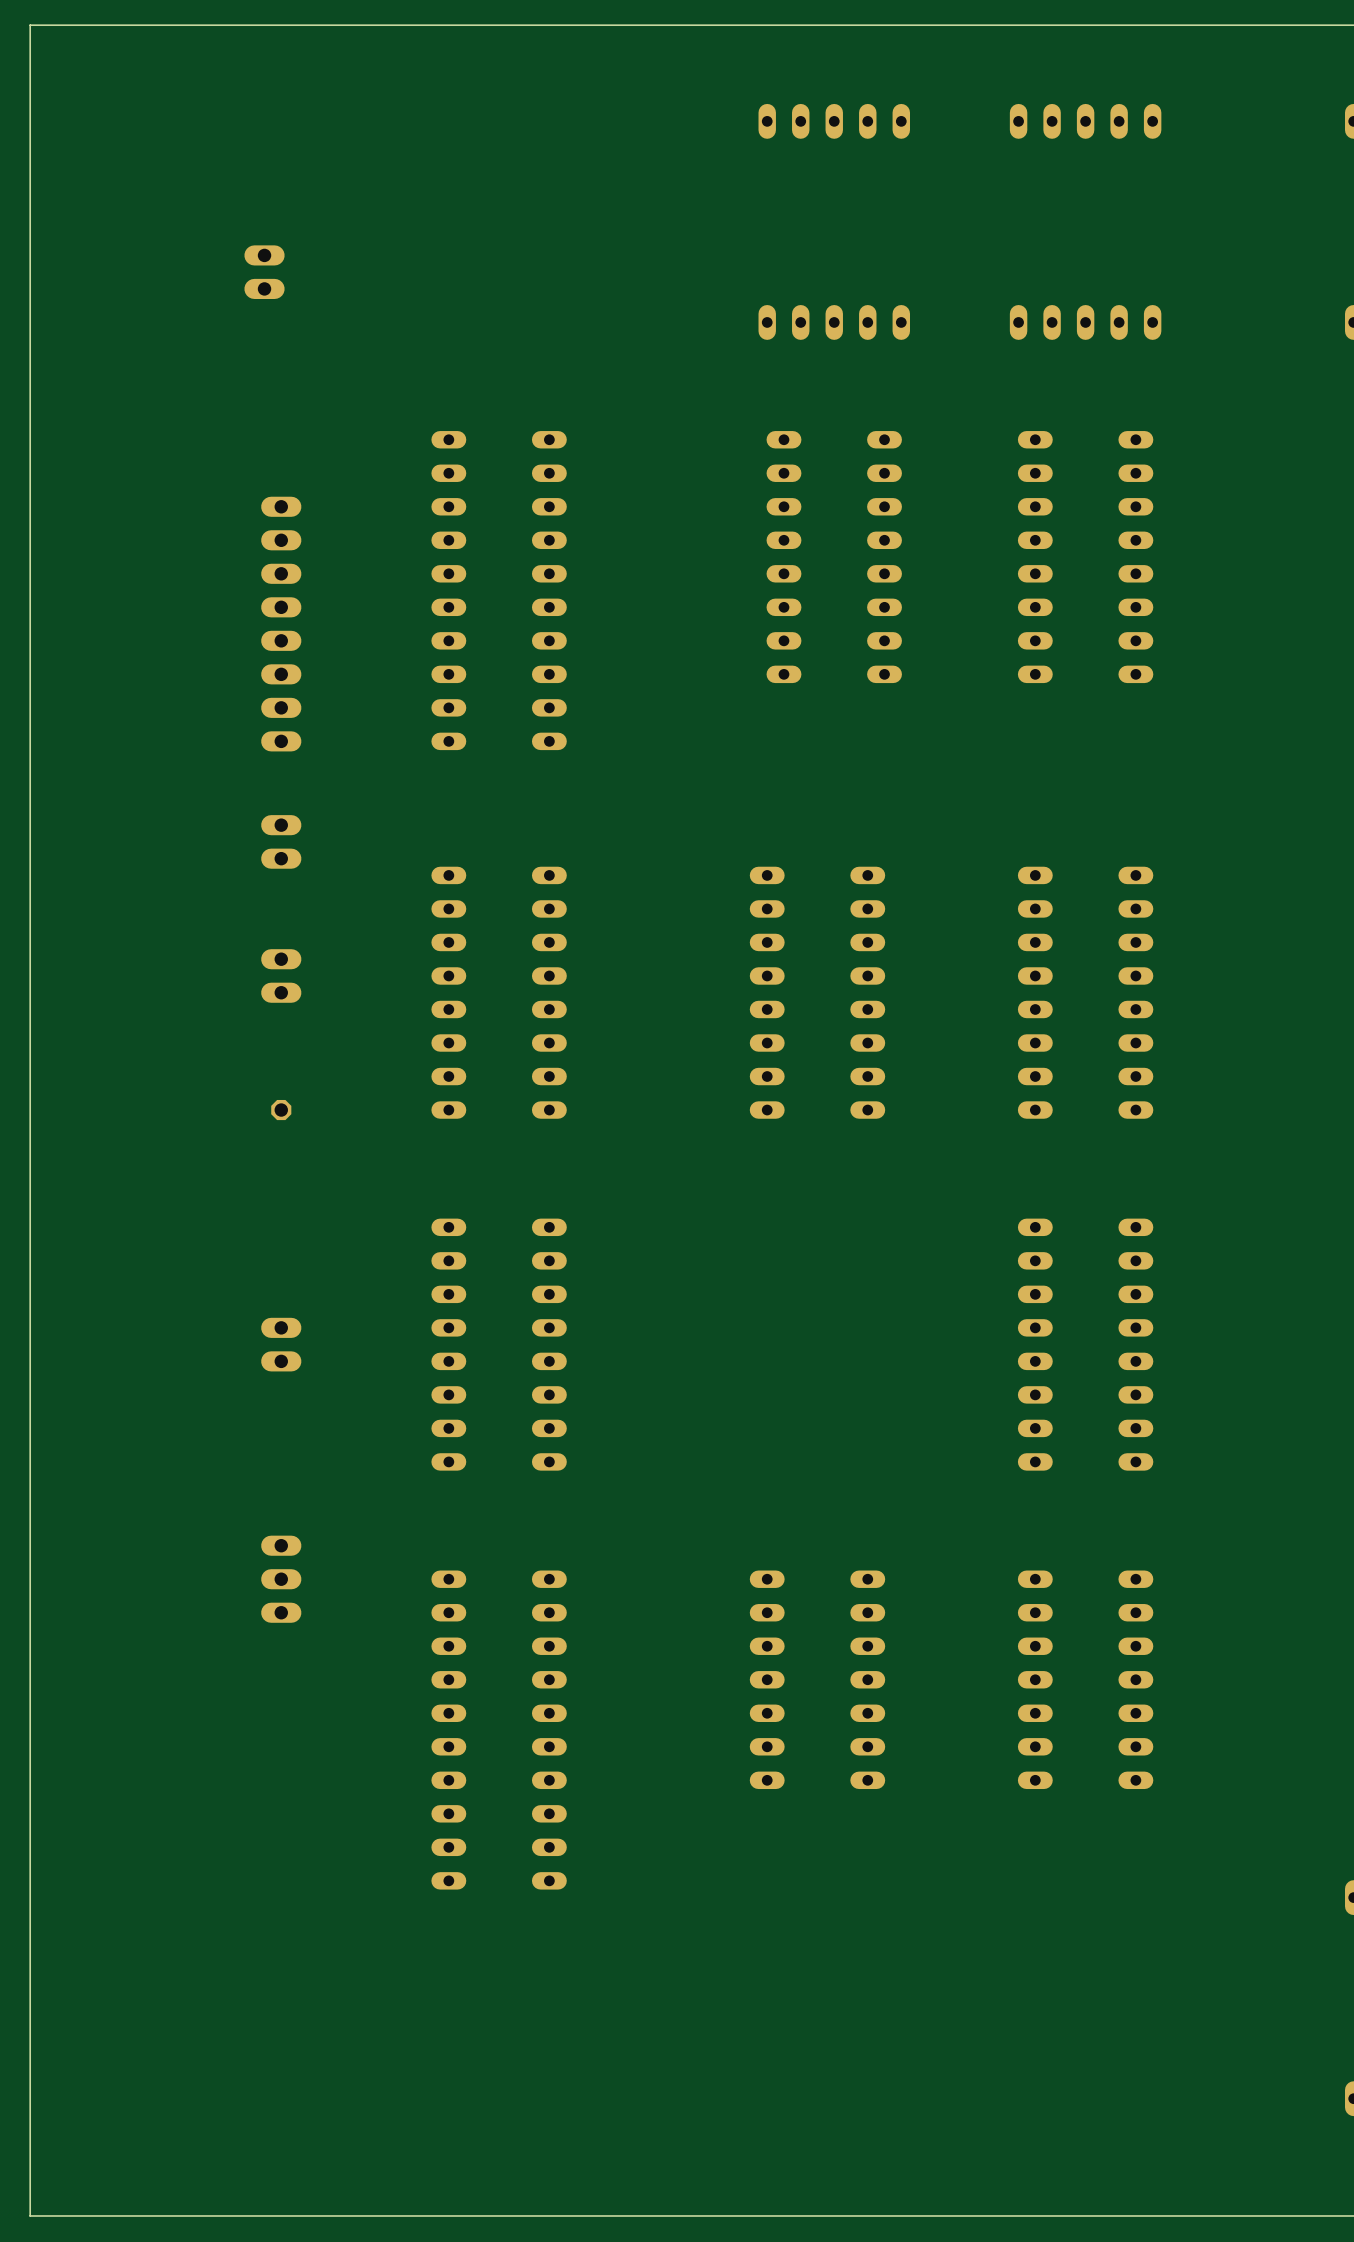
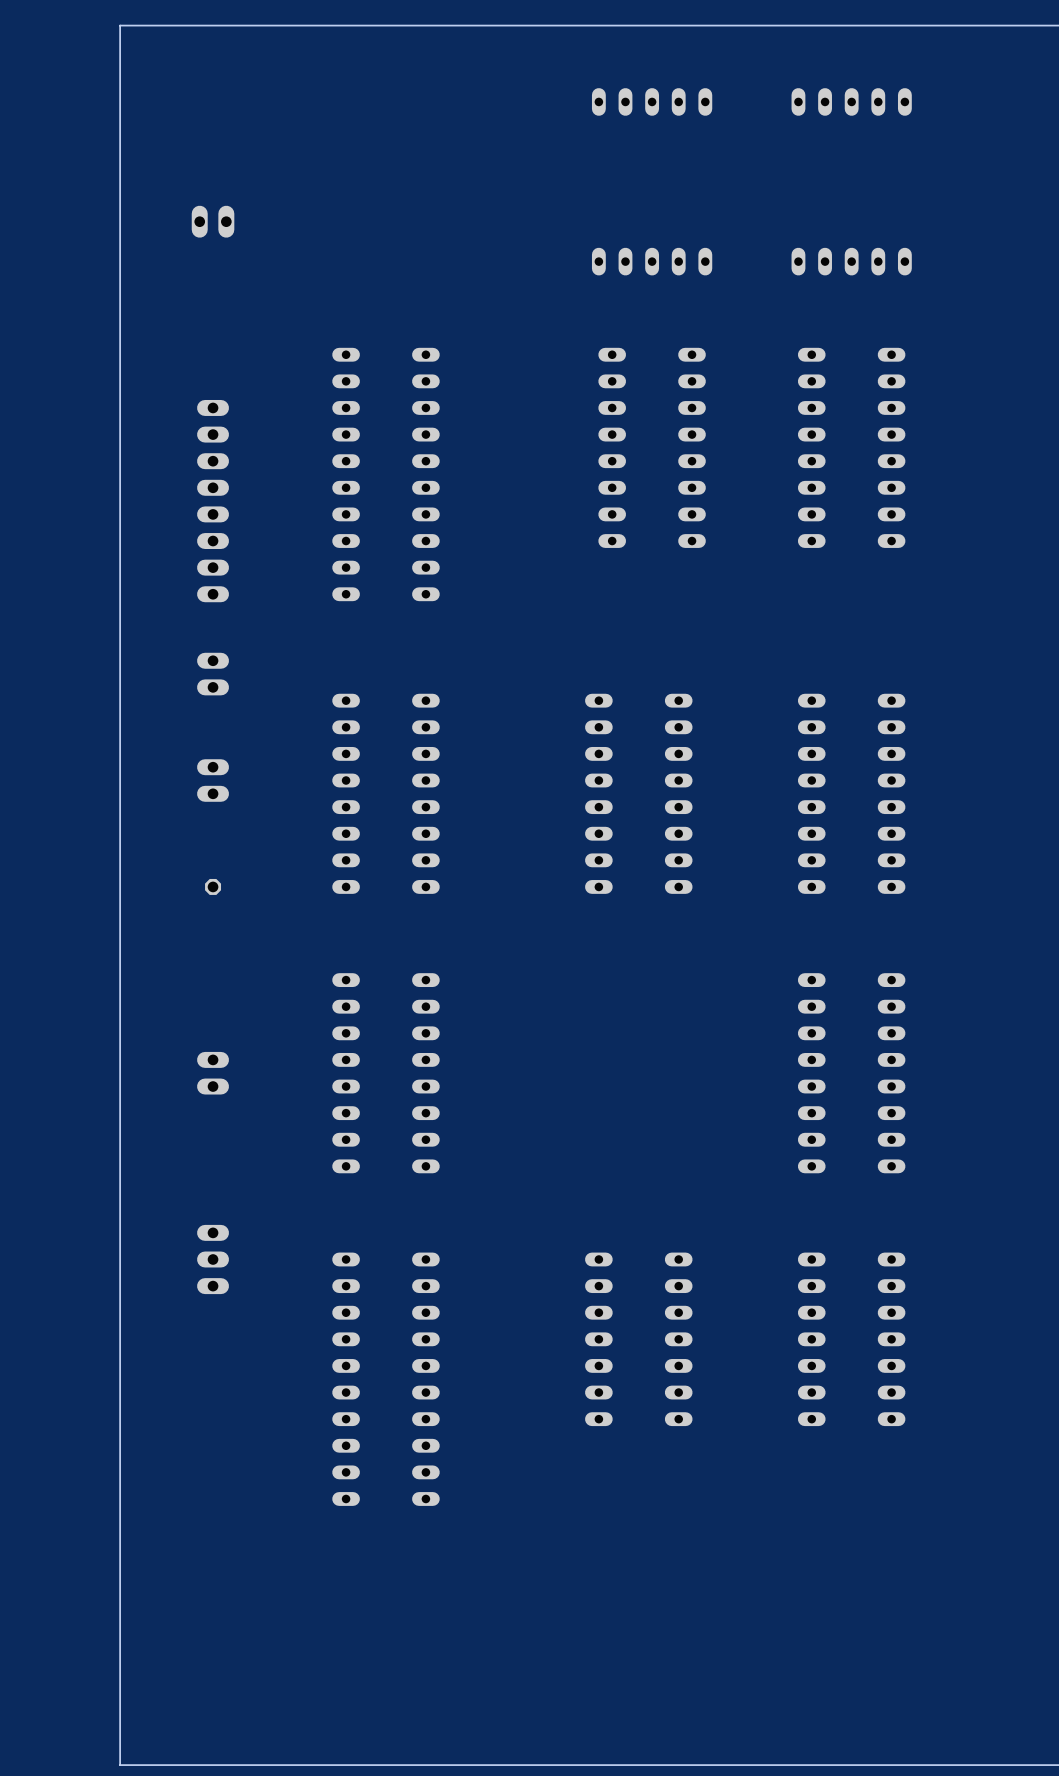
board edge: (164, 25) (30, 25) (30, 2215) (164, 2215) -> (120, 25) (120, 1765)
part rotation: 0° (264, 272) -> 90° clockwise (213, 221)

